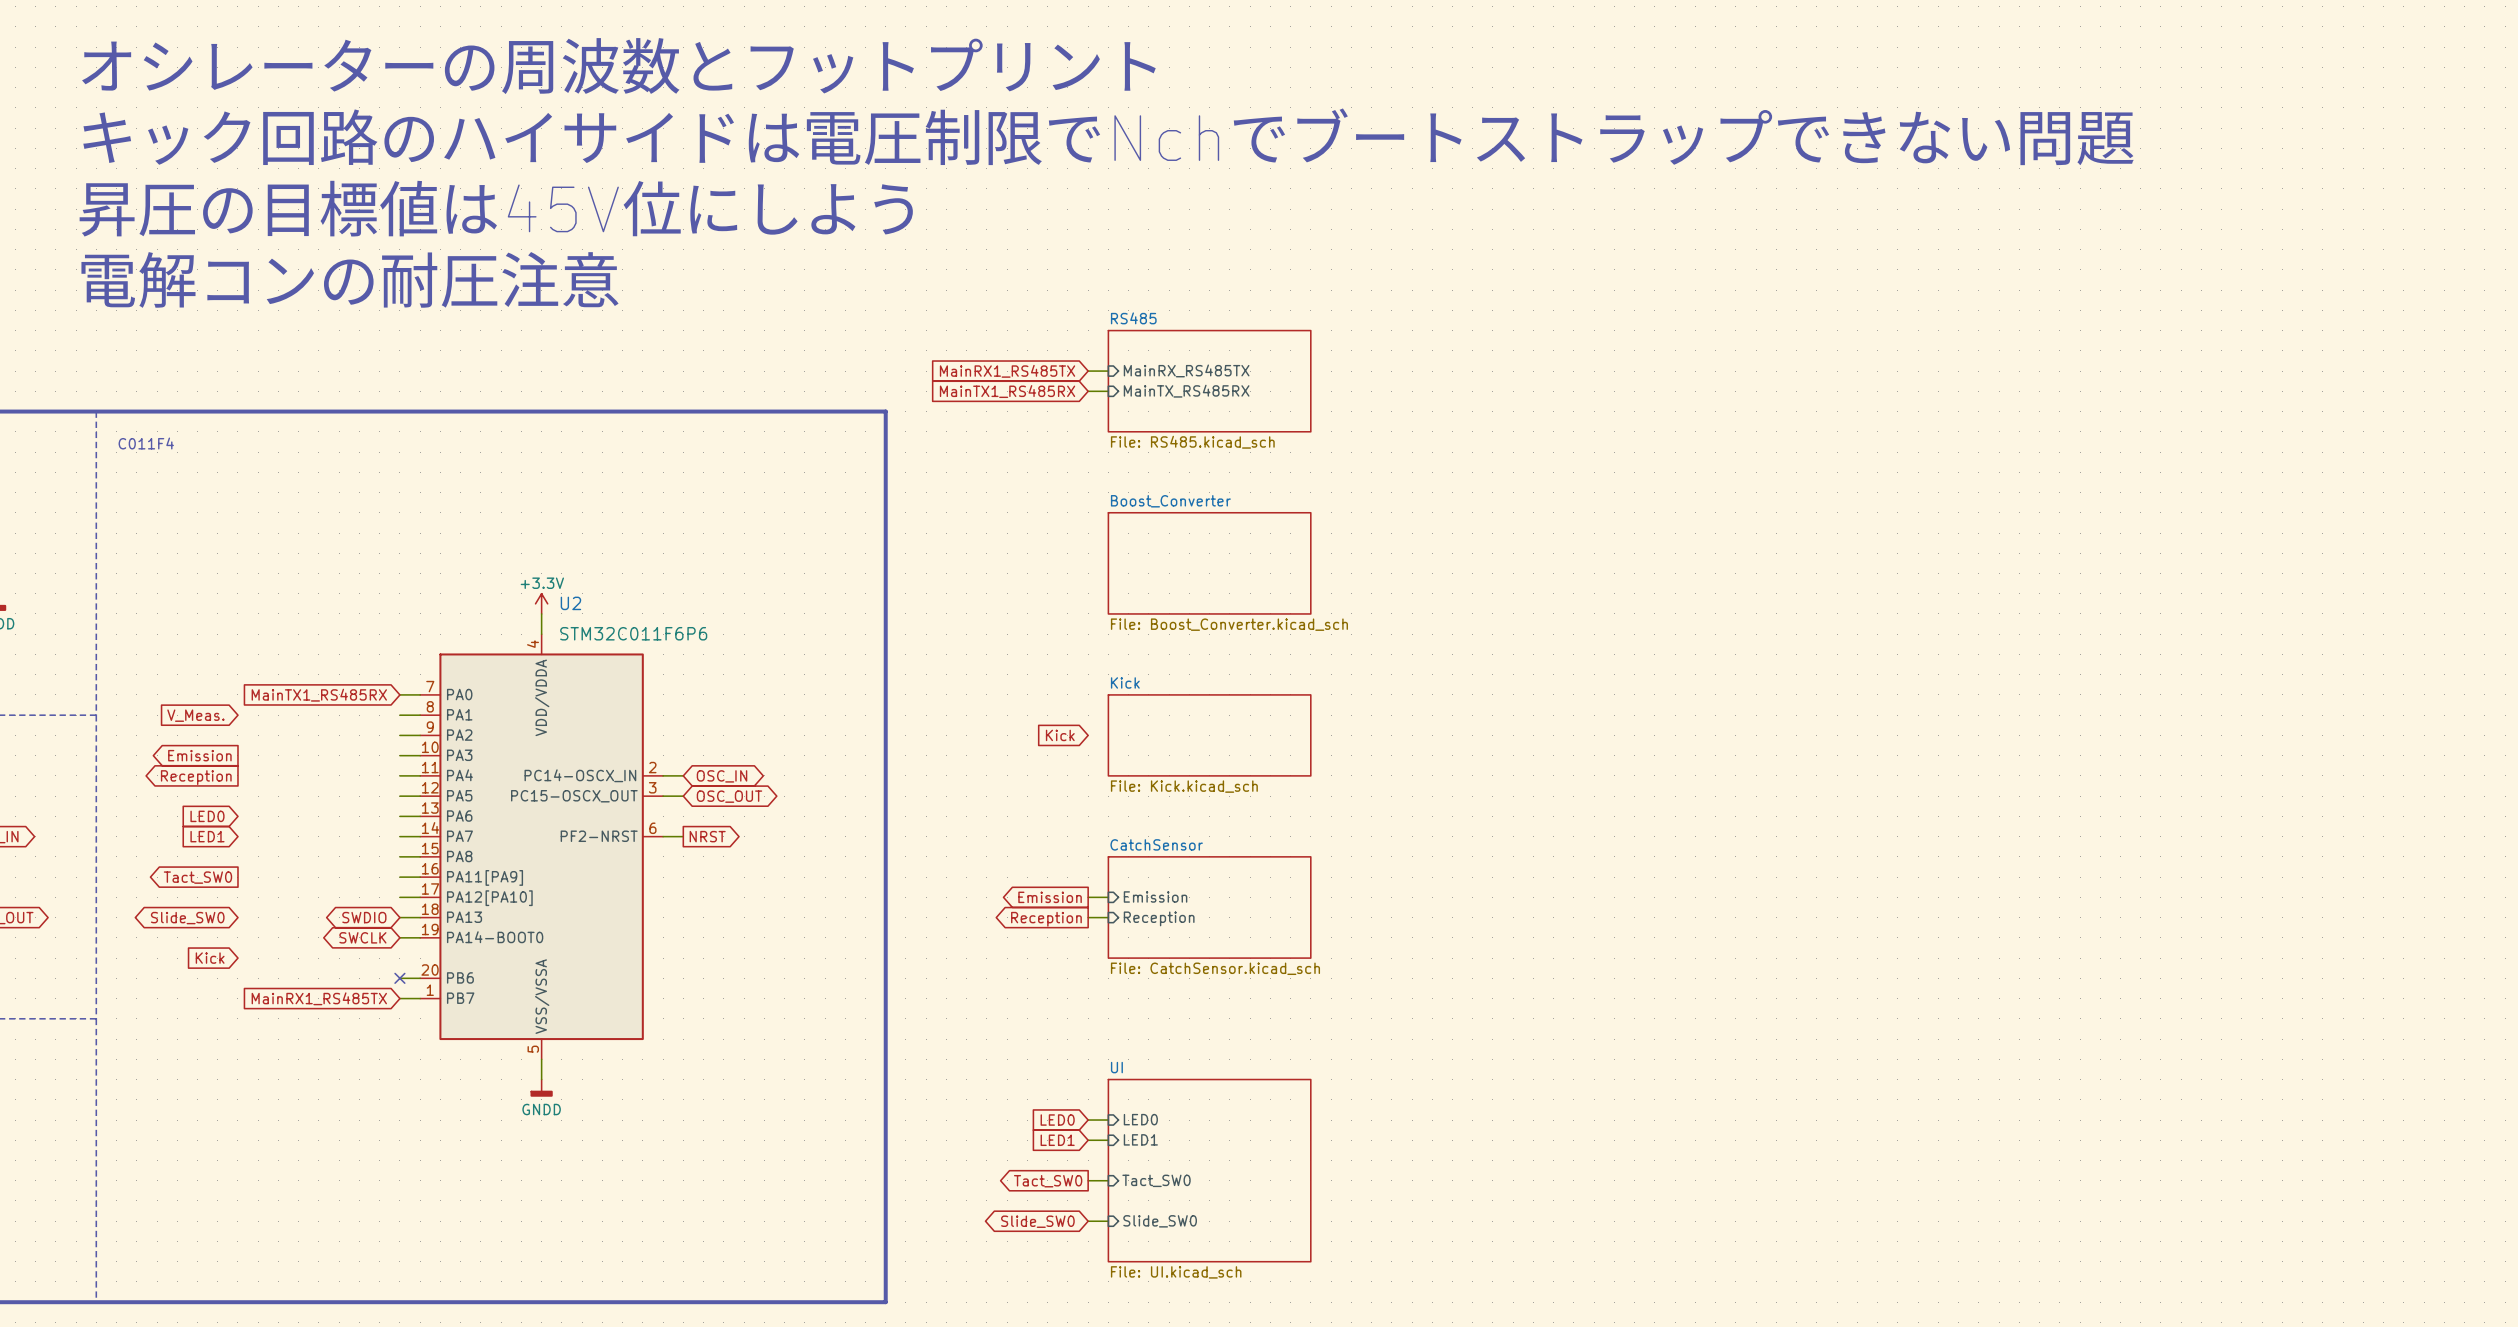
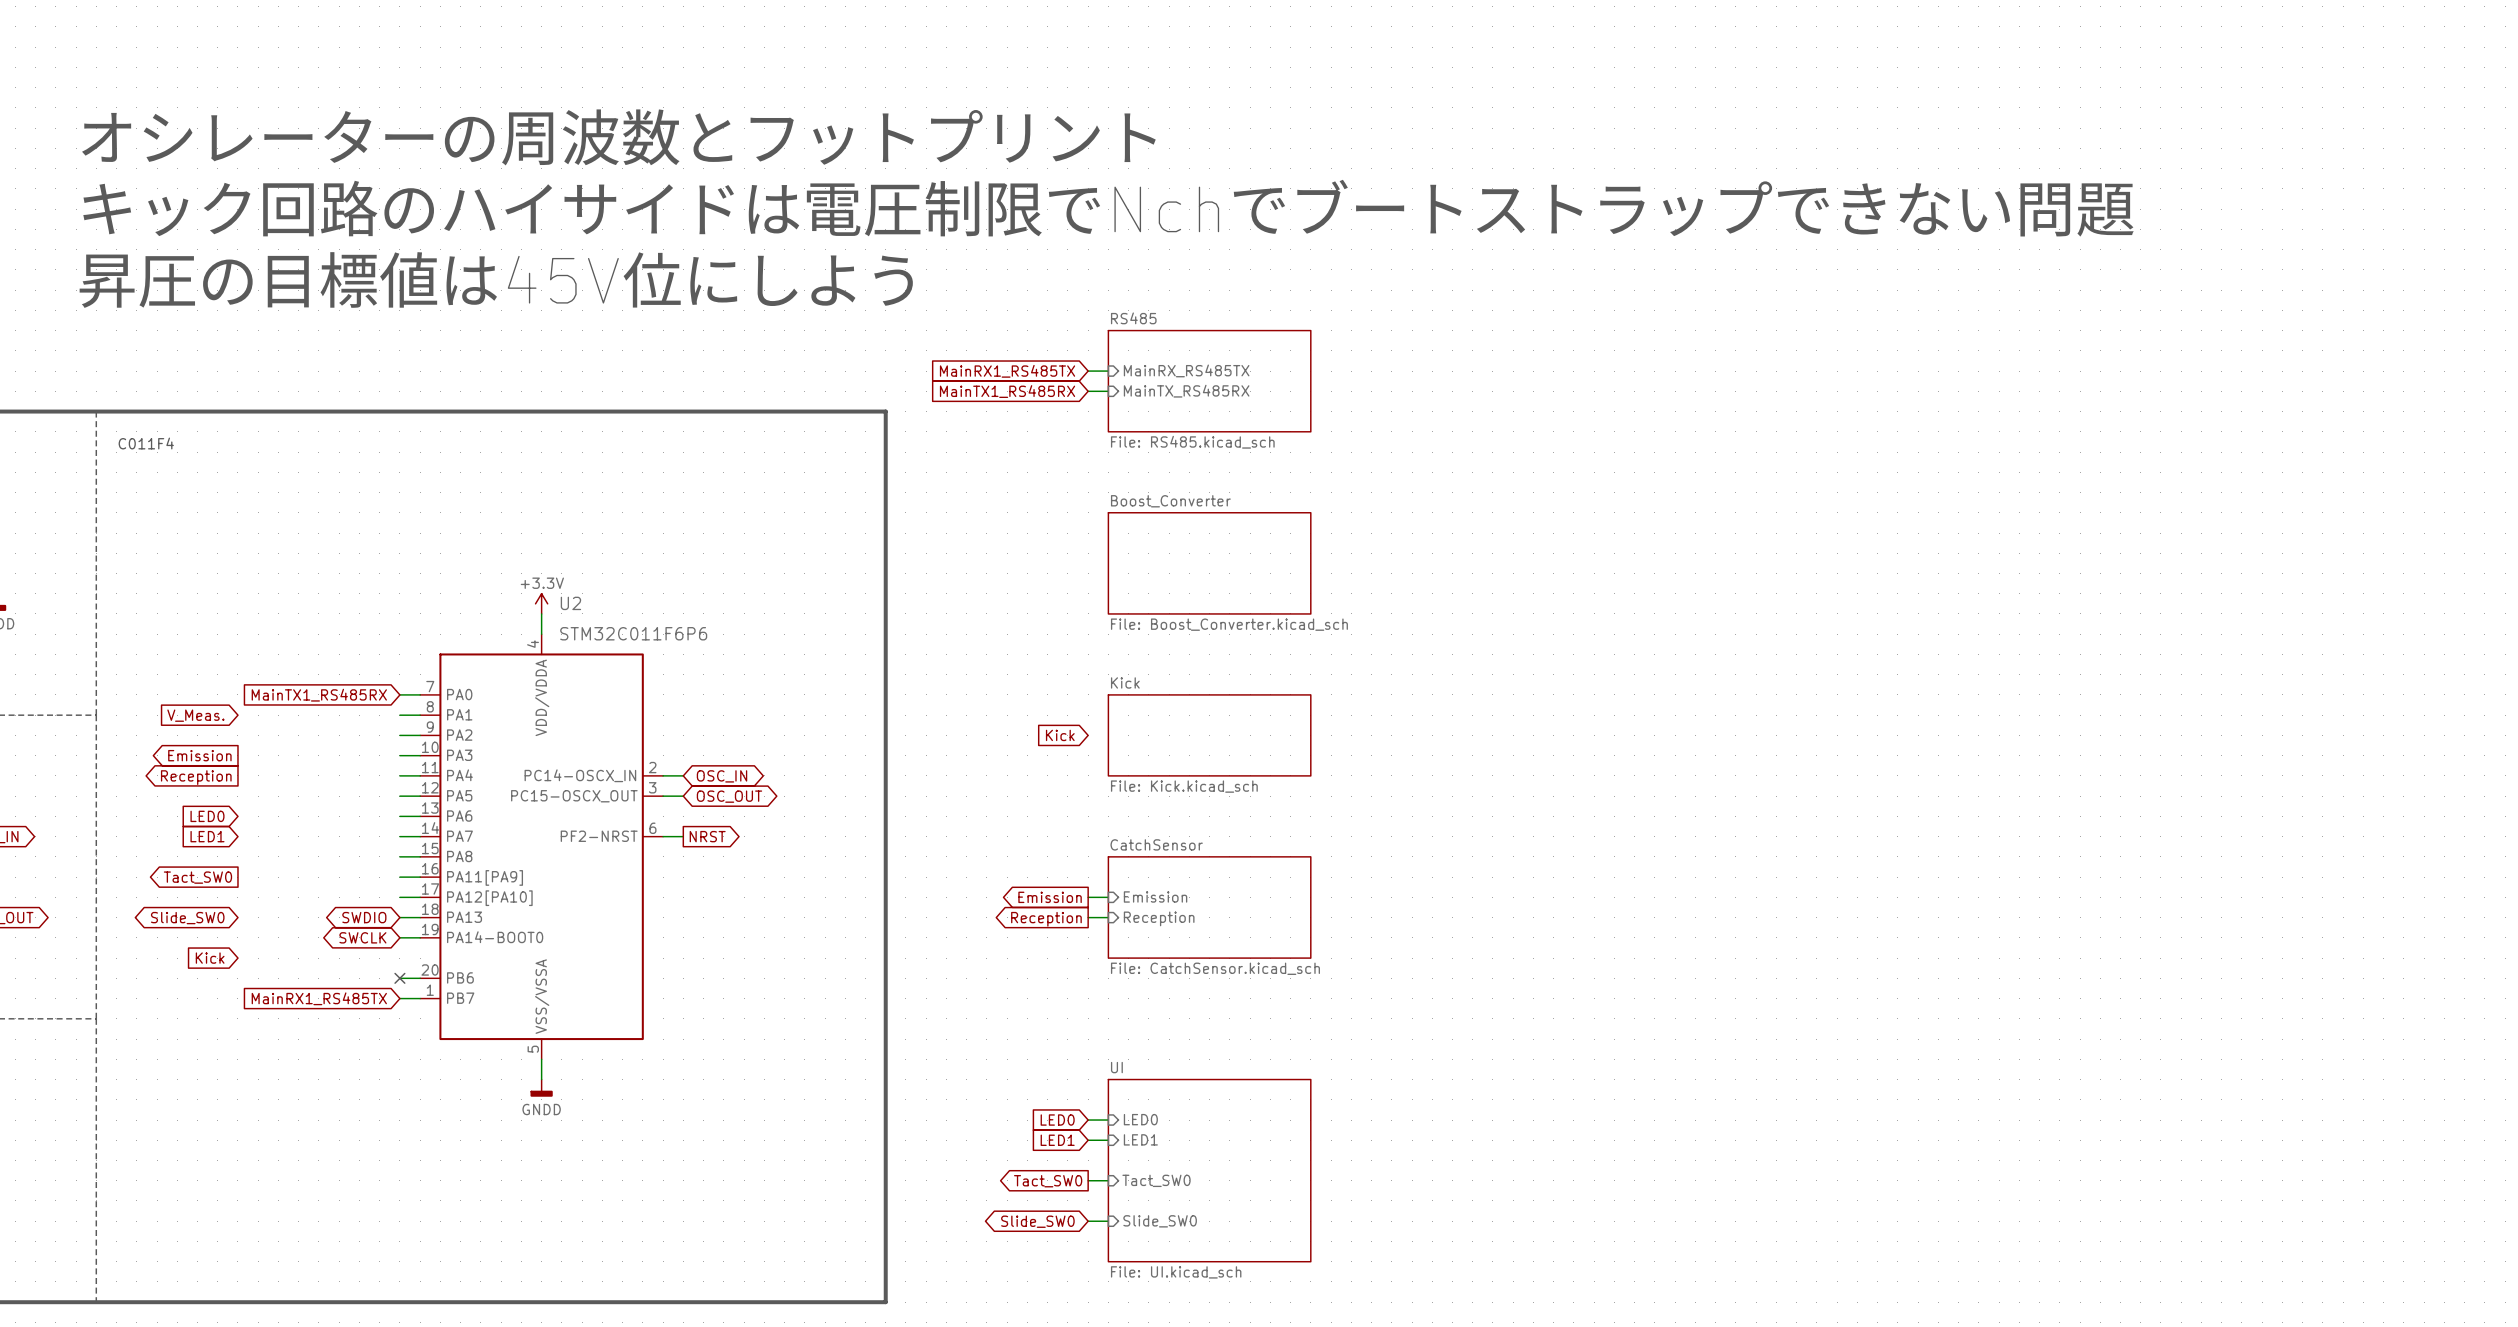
text: オシレーターの周波数とフットプリント (618, 66) -> none
text: キック回路のハイサイドは電圧制限でNchでブートストラップできない問題 (1108, 136) -> オシレーターの周波数とフットプリント (618, 137)
text: 昇圧の目標値は45V位にしよう (496, 208) -> キック回路のハイサイドは電圧制限でNchでブートストラップできない問題 (1108, 208)
text: 電解コンの耐圧注意 (350, 279) -> 昇圧の目標値は45V位にしよう (496, 280)

